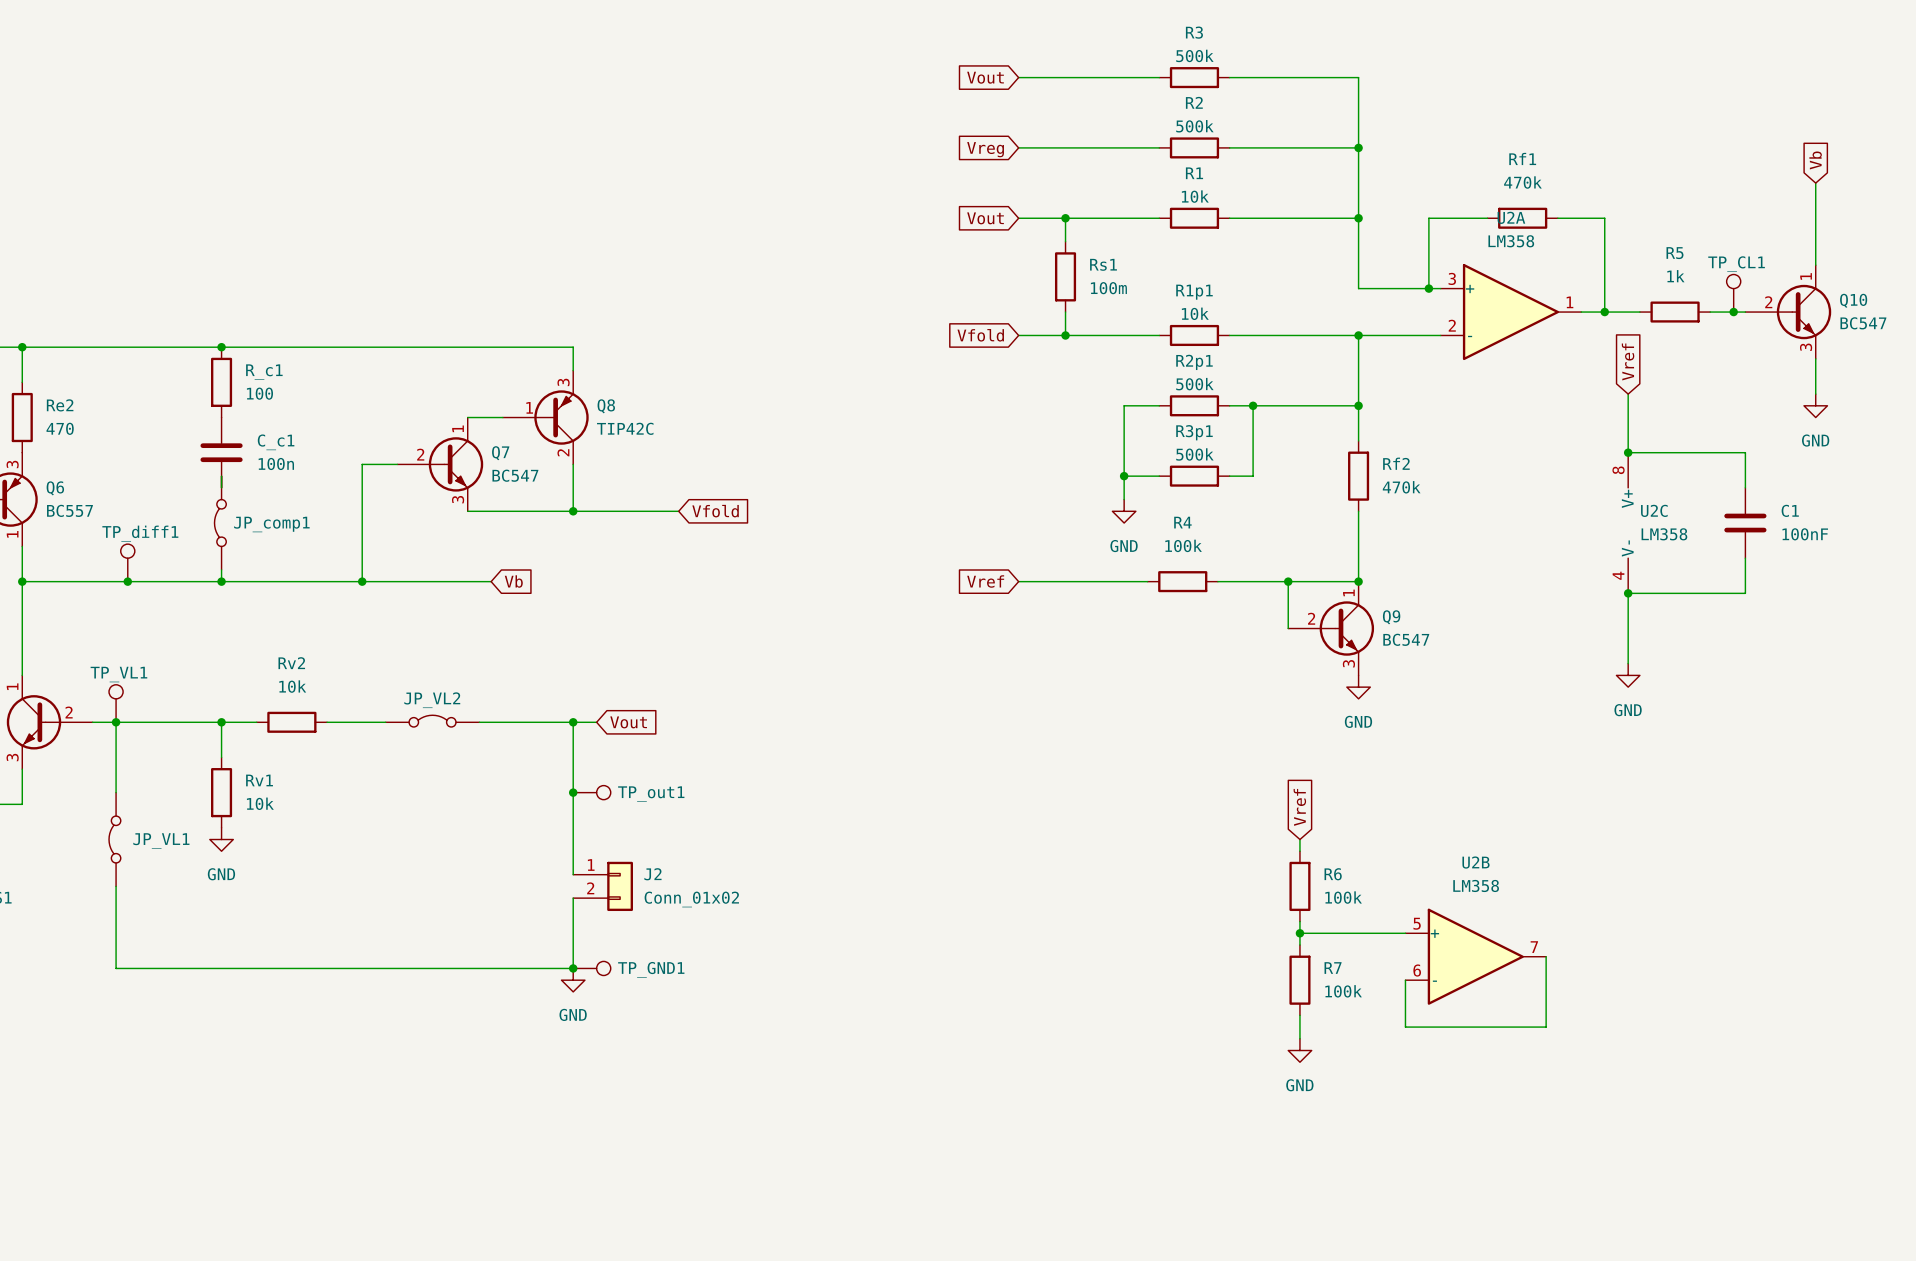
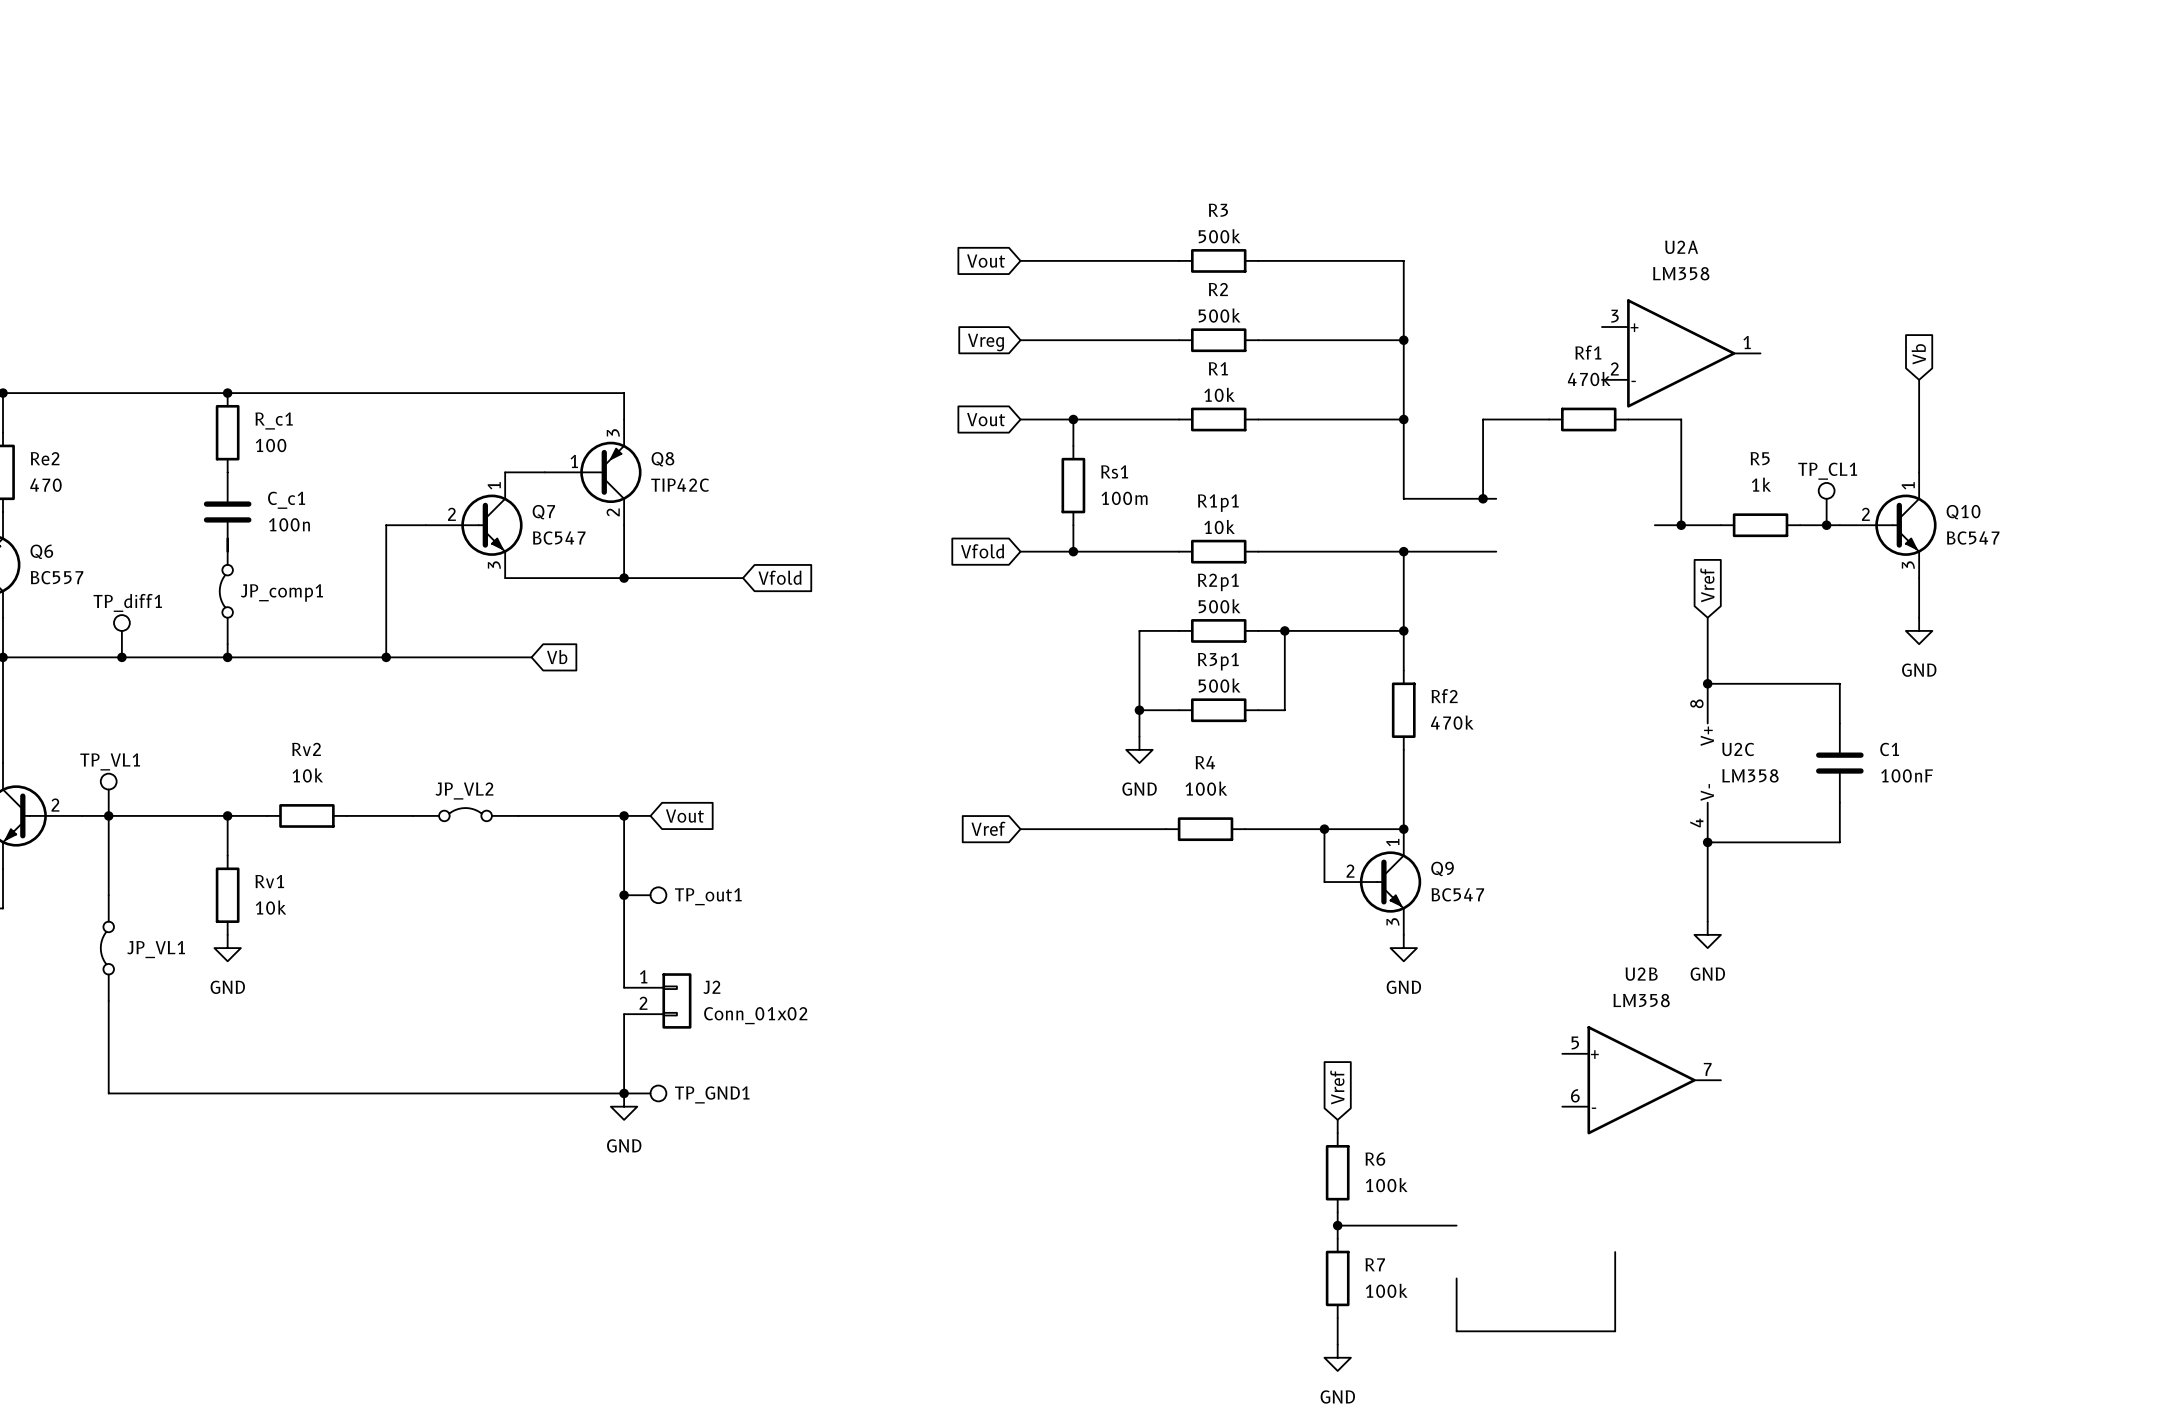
global label: Vout (985, 77) -> none
wire: (1018, 77) (1159, 77) -> (1020, 260) (1179, 260)
R3 position: (1194, 77) -> (1218, 260)
wire: (1229, 77) (1358, 77) (1358, 288) (1440, 288) -> (1258, 260) (1403, 260) (1403, 498) (1496, 498)
wire: (1018, 147) (1159, 147) -> (1020, 340) (1179, 340)
R2 position: (1194, 147) -> (1218, 340)
wire: (1229, 147) (1358, 147) -> (1258, 340) (1403, 340)
junction: (1358, 147) -> none
global label position: Vreg (985, 149) -> Vreg (985, 342)
global label position: Vb (1815, 160) -> Vb (1918, 354)
wire: (1815, 183) (1815, 265) -> (1919, 379) (1919, 472)
global label: Vout (985, 218) -> none
wire: (1018, 218) (1159, 218) -> (1020, 419) (1179, 419)
wire: (1065, 218) (1065, 241) -> (1073, 419) (1073, 445)
junction: (1065, 218) -> none
R1 position: (1194, 218) -> (1218, 419)
wire: (1229, 218) (1358, 218) -> (1258, 419) (1403, 419)
junction: (1358, 218) -> none
wire: (1487, 218) (1428, 218) (1428, 288) -> (1549, 419) (1483, 419) (1483, 498)
Rf1 position: (1522, 218) -> (1588, 419)
wire: (1557, 218) (1604, 218) (1604, 312) -> (1628, 419) (1681, 419) (1681, 525)
global label: none -> Vout (986, 261)
Rs1 position: (1065, 276) -> (1073, 485)
junction: (1428, 288) -> none
TP_CL1 position: (1733, 293) -> (1826, 504)
junction: none -> (1403, 340)
wire: (1065, 312) (1065, 335) -> (1073, 525) (1073, 551)
wire: (1581, 312) (1639, 312) -> (1654, 525) (1720, 525)
junction: (1604, 312) -> none
R5 position: (1675, 312) -> (1760, 525)
wire: (1710, 312) (1745, 312) -> (1800, 525) (1839, 525)
junction: (1733, 312) -> none
Q10 position: (1788, 312) -> (1888, 525)
global label position: Vfold (980, 335) -> Vfold (982, 551)
wire: (1018, 335) (1159, 335) -> (1020, 551) (1179, 551)
junction: (1065, 335) -> none
R1p1 position: (1194, 335) -> (1218, 551)
wire: (1229, 335) (1440, 335) -> (1258, 551) (1496, 551)
wire: (1358, 335) (1358, 440) -> (1403, 551) (1403, 670)
junction: (1358, 335) -> none
wire: (1815, 358) (1815, 394) -> (1919, 578) (1919, 617)
global label position: Vref (1628, 361) -> Vref (1707, 585)
global label: none -> Vout (986, 419)
junction: none -> (1073, 419)
wire: (1628, 394) (1628, 452) (1745, 452) (1745, 487) -> (1707, 617) (1707, 683) (1839, 683) (1839, 723)
wire: (1159, 405) (1124, 405) (1124, 499) -> (1179, 630) (1139, 630) (1139, 736)
R2p1 position: (1194, 405) -> (1218, 630)
wire: (1229, 405) (1358, 405) -> (1258, 630) (1403, 630)
wire: (1253, 405) (1253, 476) (1229, 476) -> (1284, 630) (1284, 710) (1258, 710)
junction position: (1253, 405) -> (1403, 419)
junction position: (1358, 405) -> (1483, 498)
power symbol: GND (1815, 405) -> none
junction position: (1628, 452) -> (1826, 525)
junction: none -> (1681, 525)
wire: (1124, 476) (1159, 476) -> (1139, 710) (1179, 710)
junction: (1124, 476) -> none
R3p1 position: (1194, 476) -> (1218, 710)
Rf2 position: (1358, 476) -> (1403, 710)
junction: none -> (1073, 551)
junction: none -> (1403, 551)
power symbol: GND (1124, 511) -> none
wire: (1358, 511) (1358, 581) (1217, 581) -> (1403, 749) (1403, 829) (1245, 829)
U2C position: (1628, 523) -> (1707, 763)
C1 position: (1745, 523) -> (1839, 763)
junction: none -> (1284, 630)
power symbol: none -> GND (1919, 630)
wire: (1745, 558) (1745, 593) (1628, 593) (1628, 663) -> (1839, 802) (1839, 842) (1707, 842) (1707, 921)
global label position: Vref (985, 581) -> Vref (988, 828)
wire: (1018, 581) (1147, 581) -> (1020, 829) (1165, 829)
R4 position: (1182, 581) -> (1205, 829)
wire: (1288, 581) (1288, 628) -> (1324, 829) (1324, 882)
junction position: (1288, 581) -> (1403, 630)
junction: (1358, 581) -> none
junction: (1628, 593) -> none
junction: none -> (1707, 683)
junction: none -> (1139, 710)
Q9 position: (1331, 628) -> (1372, 882)
power symbol: none -> GND (1139, 749)
power symbol: GND (1628, 675) -> none
power symbol: GND (1358, 687) -> none
junction: none -> (1324, 829)
junction: none -> (1403, 829)
junction: none -> (1707, 842)
global label position: Vref (1299, 807) -> Vref (1337, 1087)
power symbol: none -> GND (1707, 934)
power symbol: none -> GND (1403, 948)
wire: (1299, 839) (1299, 851) -> (1337, 1119) (1337, 1133)
R6 position: (1299, 886) -> (1337, 1172)
wire: (1299, 921) (1299, 945) -> (1337, 1212) (1337, 1238)
wire: (1299, 933) (1405, 933) -> (1337, 1225) (1456, 1225)
junction: (1299, 933) -> none
wire: (1546, 956) (1546, 1027) (1405, 1027) (1405, 980) -> (1615, 1252) (1615, 1331) (1456, 1331) (1456, 1278)
R7 position: (1299, 980) -> (1337, 1278)
wire: (1299, 1015) (1299, 1038) -> (1337, 1318) (1337, 1344)
power symbol: GND (1299, 1050) -> none
junction: none -> (1337, 1225)
power symbol: none -> GND (1337, 1357)

